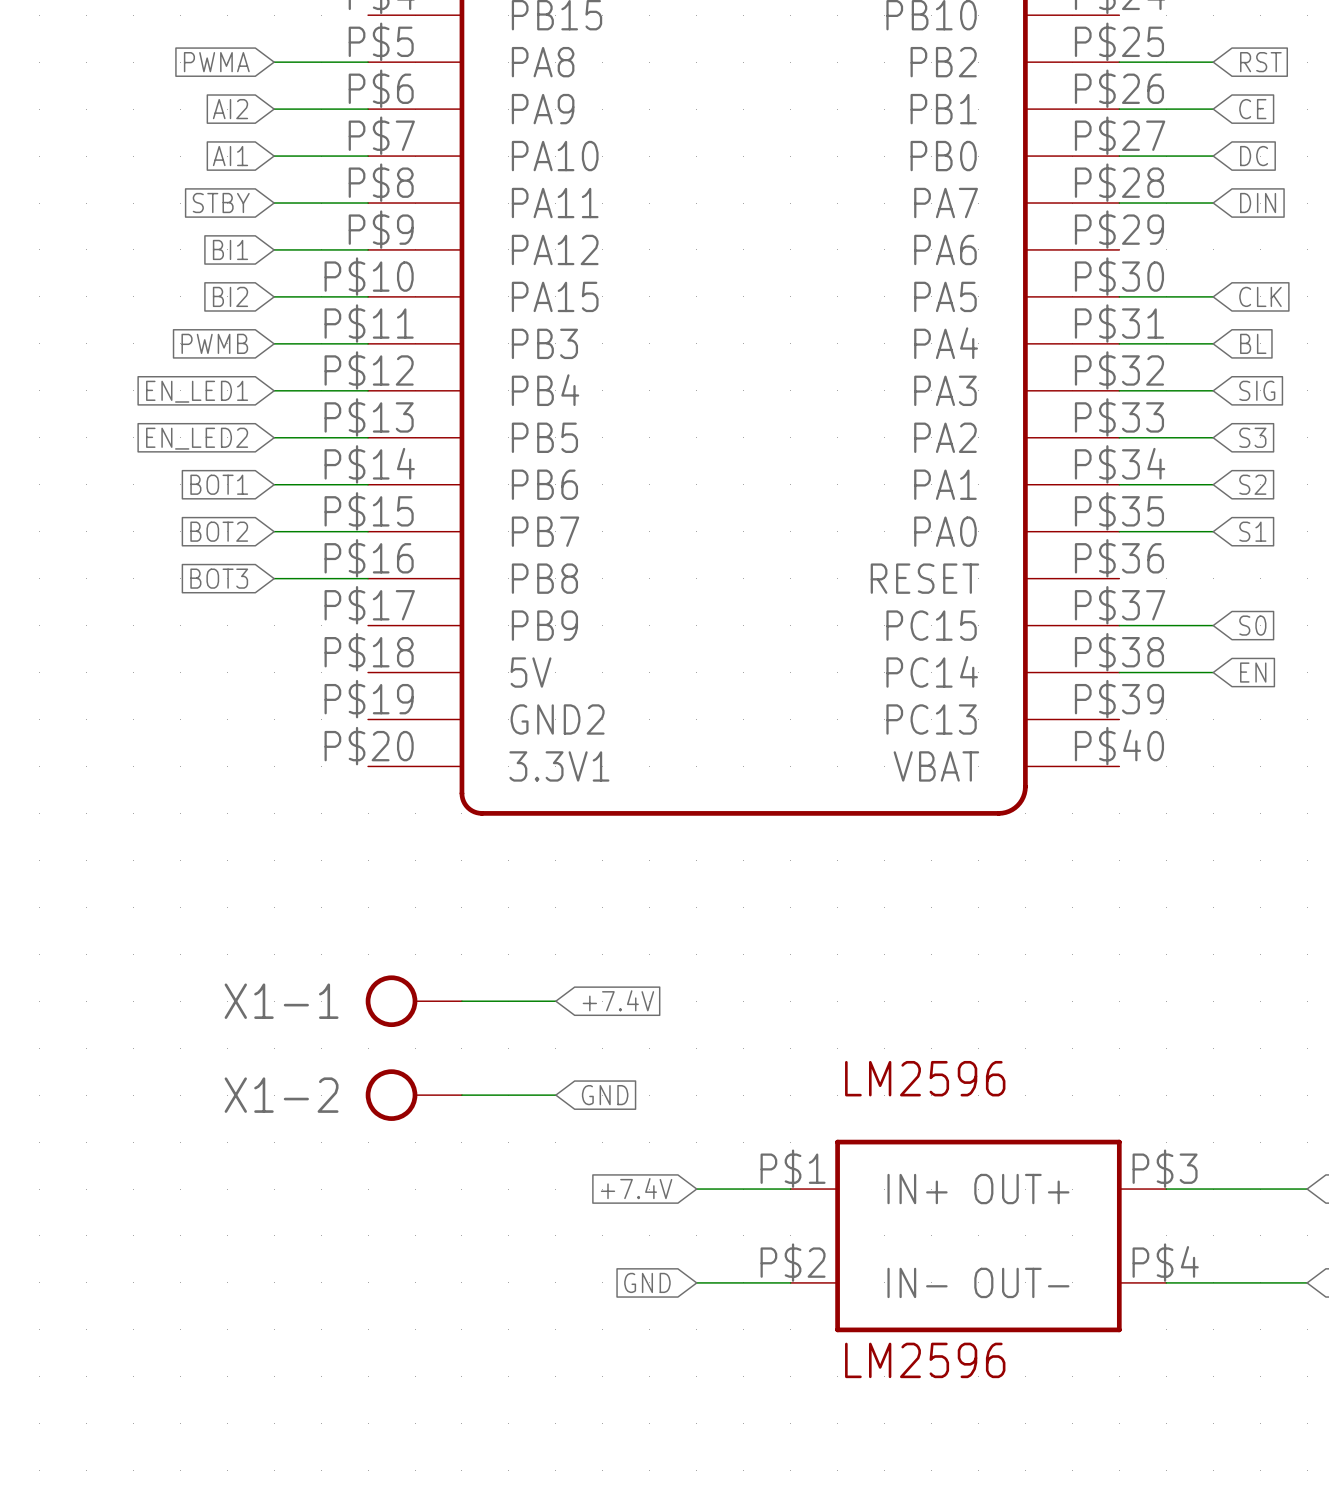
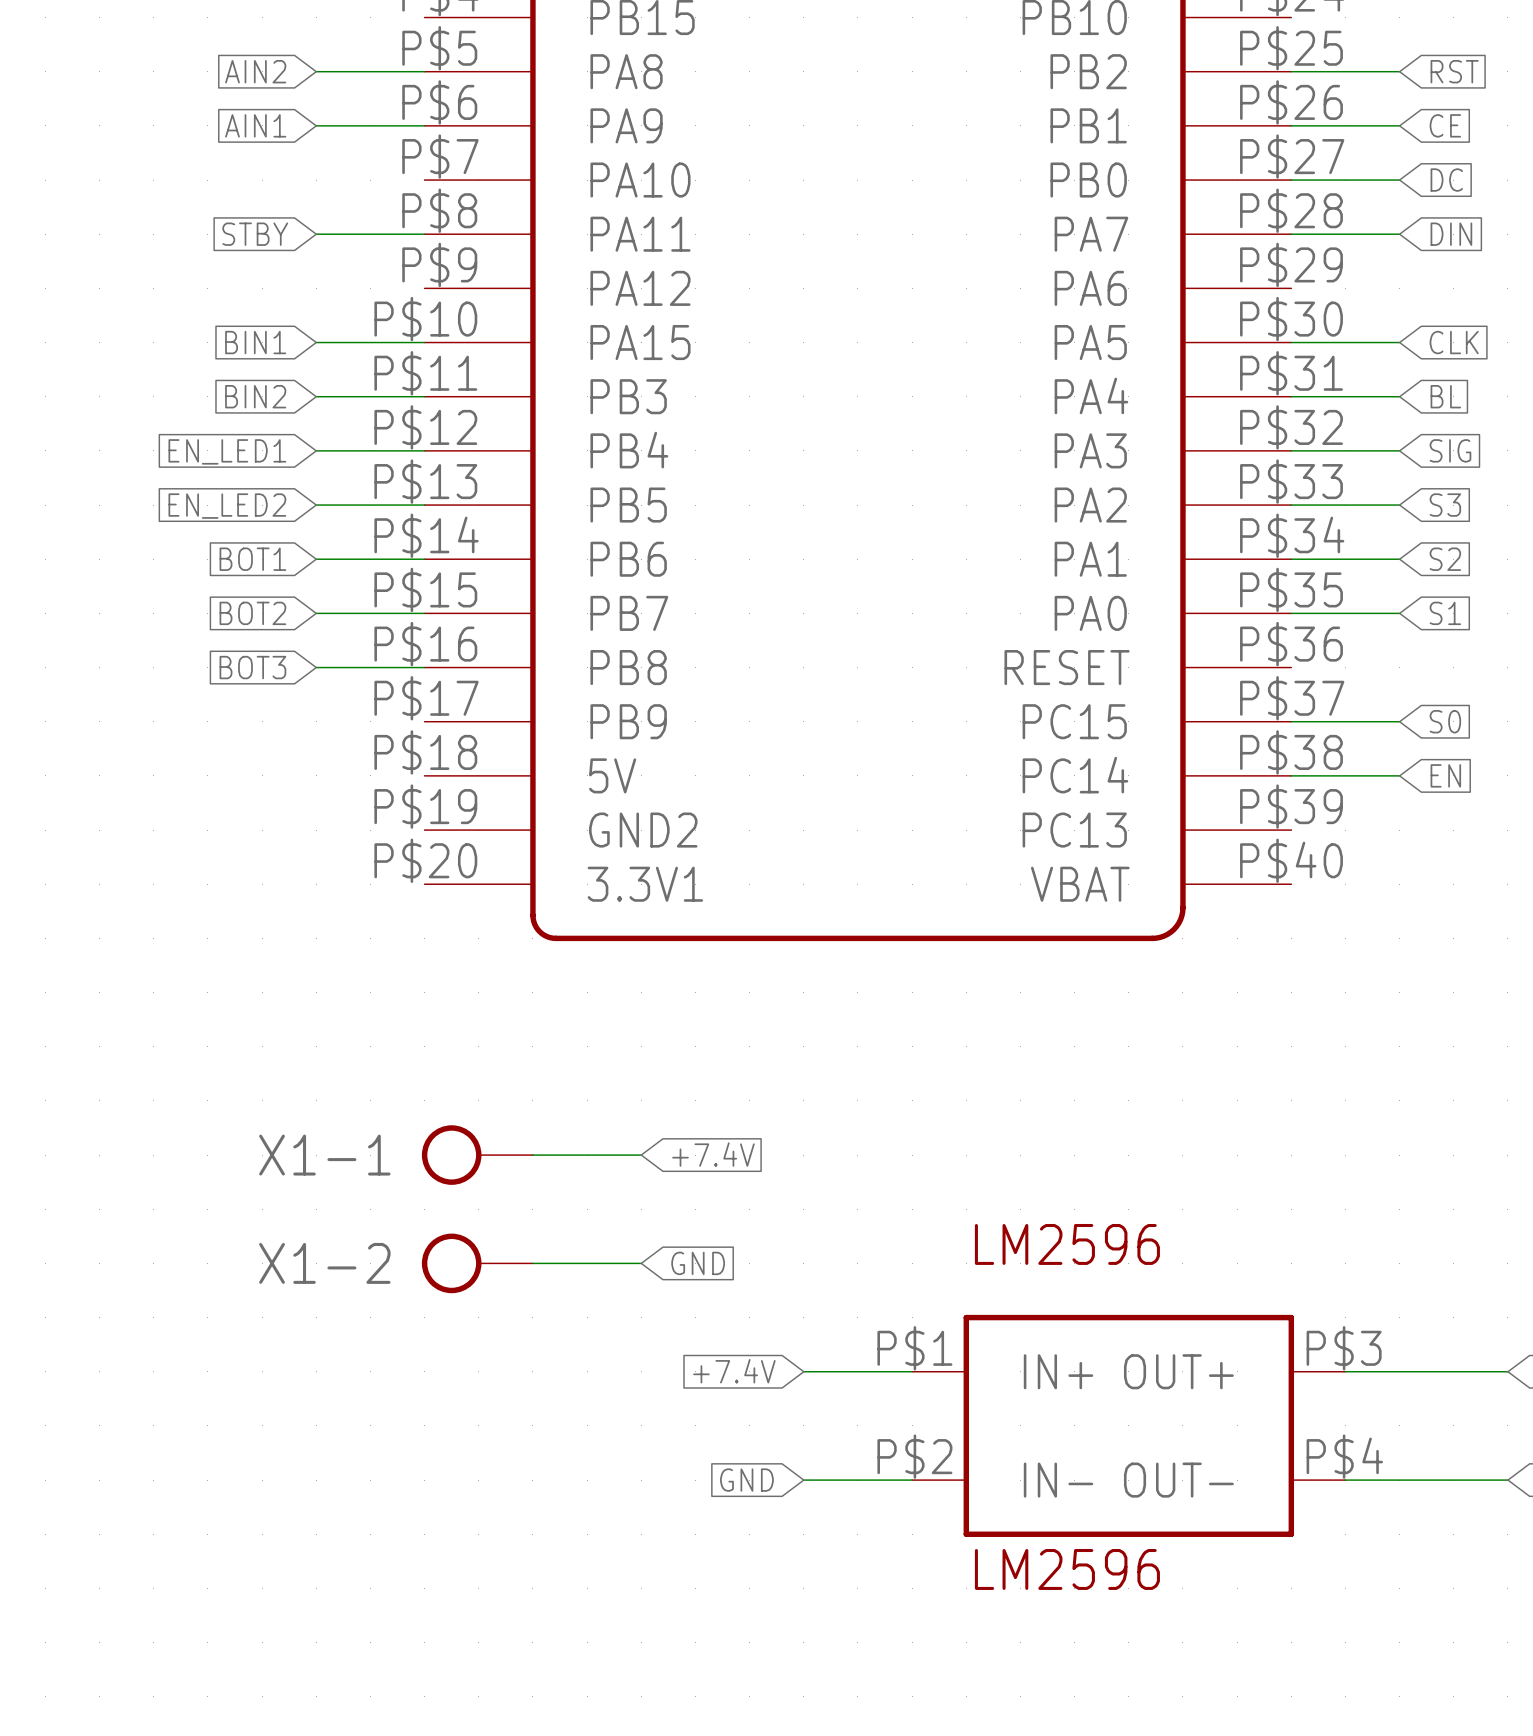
global label: PWMA (216, 62) -> AIN2 (255, 71)
global label: AI2 (230, 109) -> AIN1 (255, 125)
global label: AI1 (230, 156) -> none
wire: (274, 156) (368, 156) -> none
global label: BI1 (230, 249) -> none
wire: (274, 249) (368, 249) -> none
global label: BI2 (230, 296) -> BIN1 (255, 342)
global label: PWMB (214, 343) -> BIN2 (255, 396)

